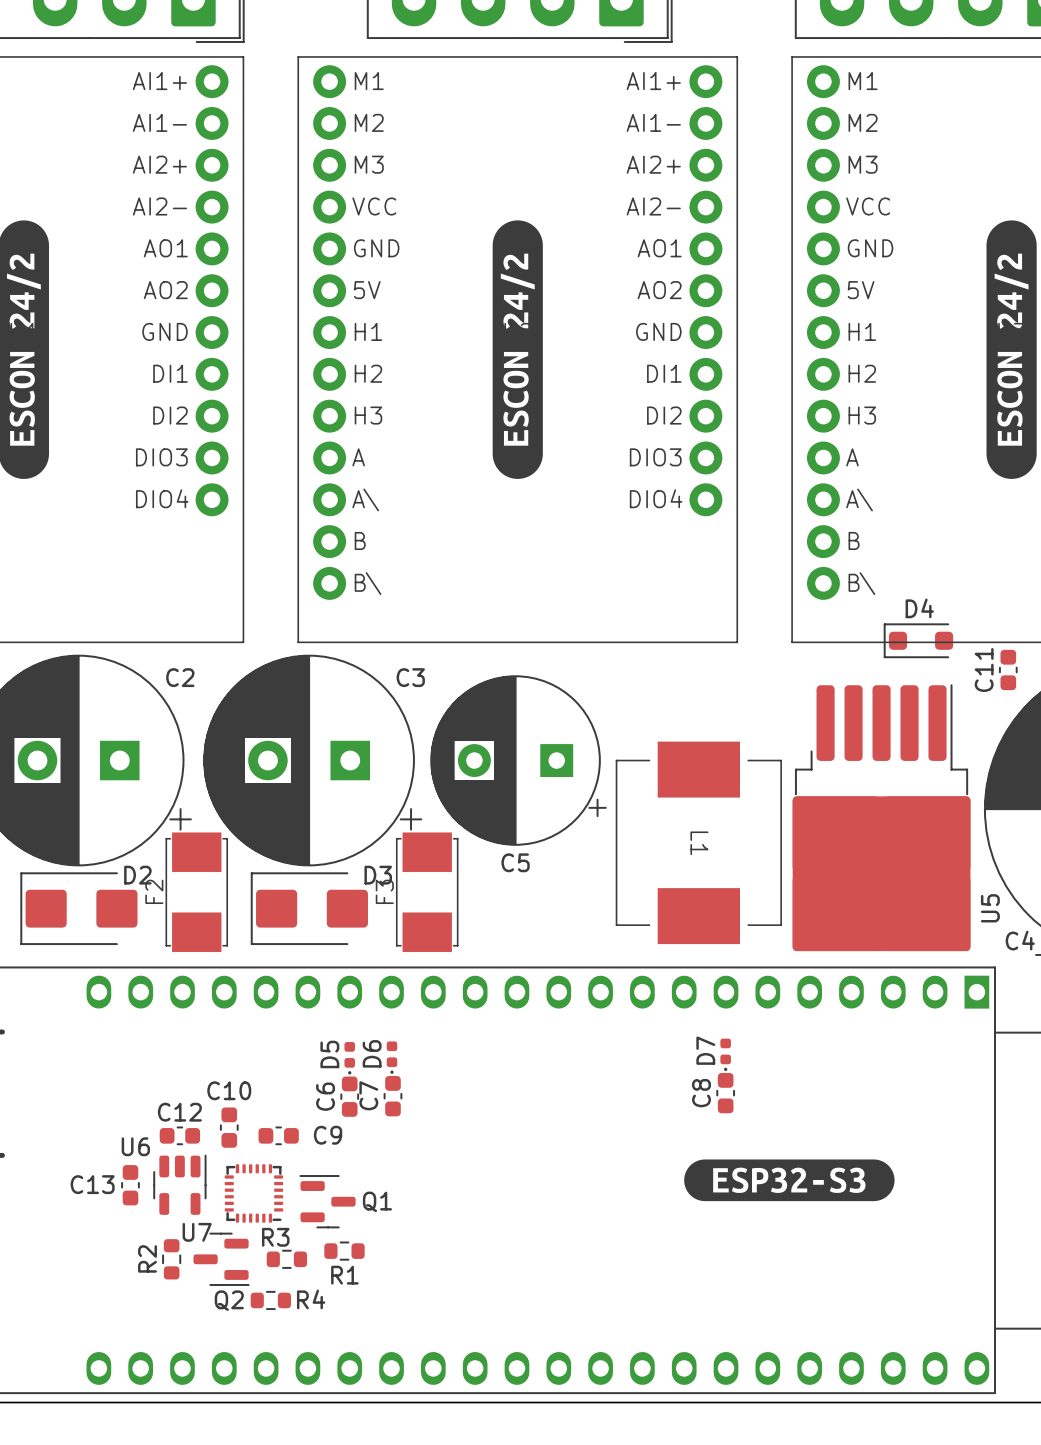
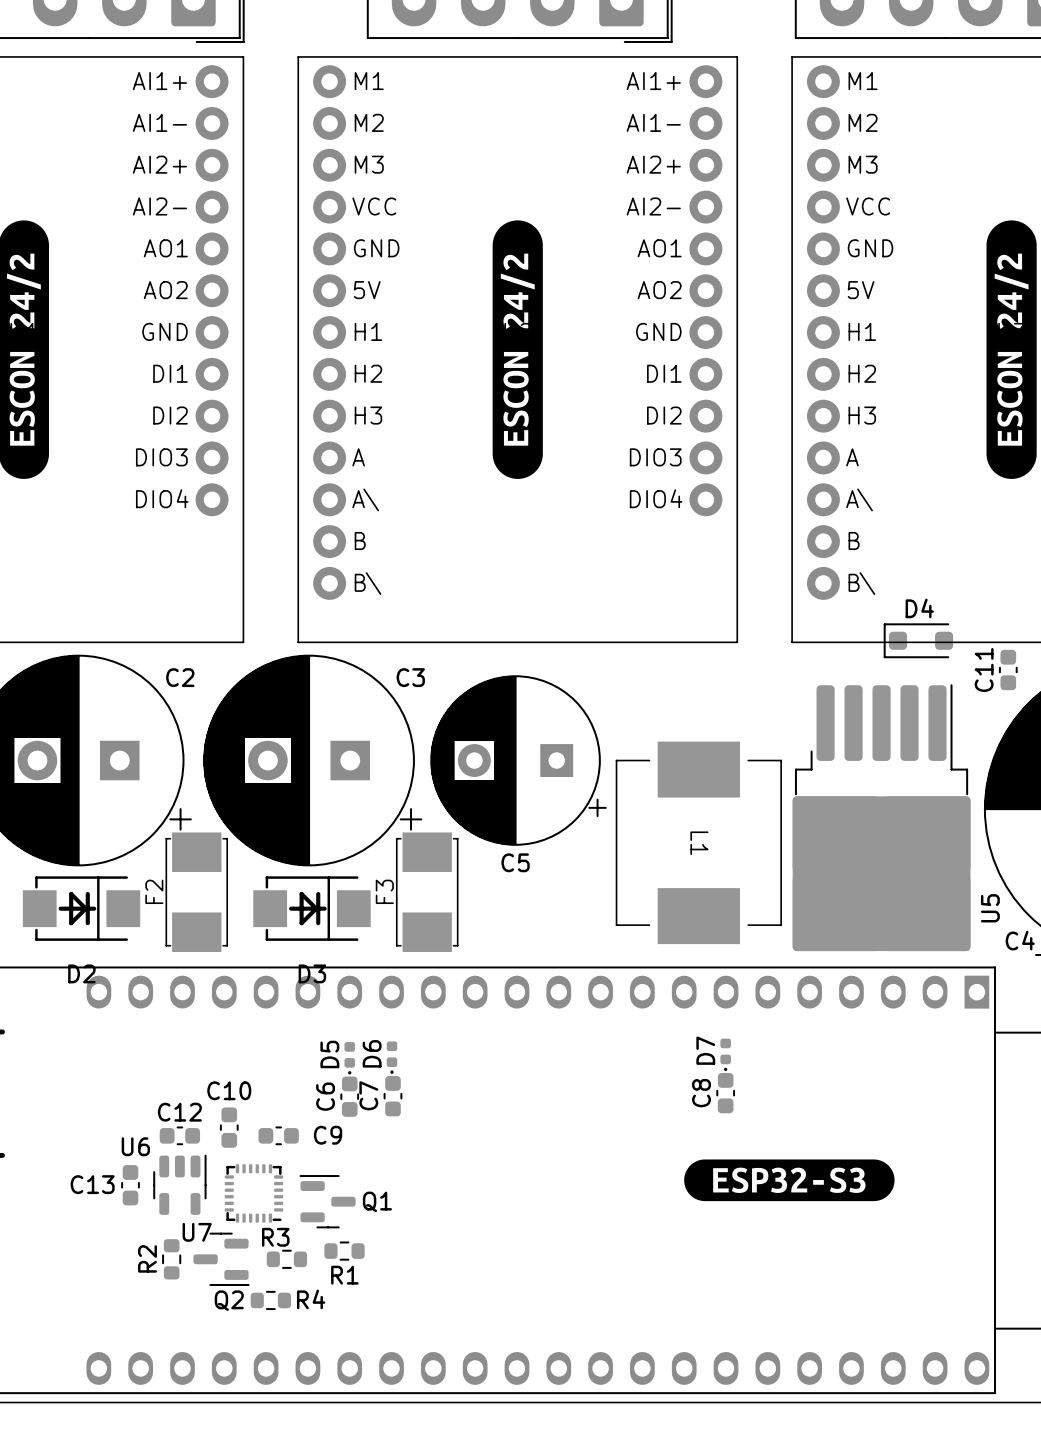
D2 footprint: [20, 872, 138, 946] -> [22, 876, 141, 941]
D3 footprint: [250, 872, 368, 946] -> [253, 876, 371, 941]
D2 name position: D2 (137, 875) -> D2 (81, 973)
D3 name position: D3 (378, 875) -> D3 (312, 973)

